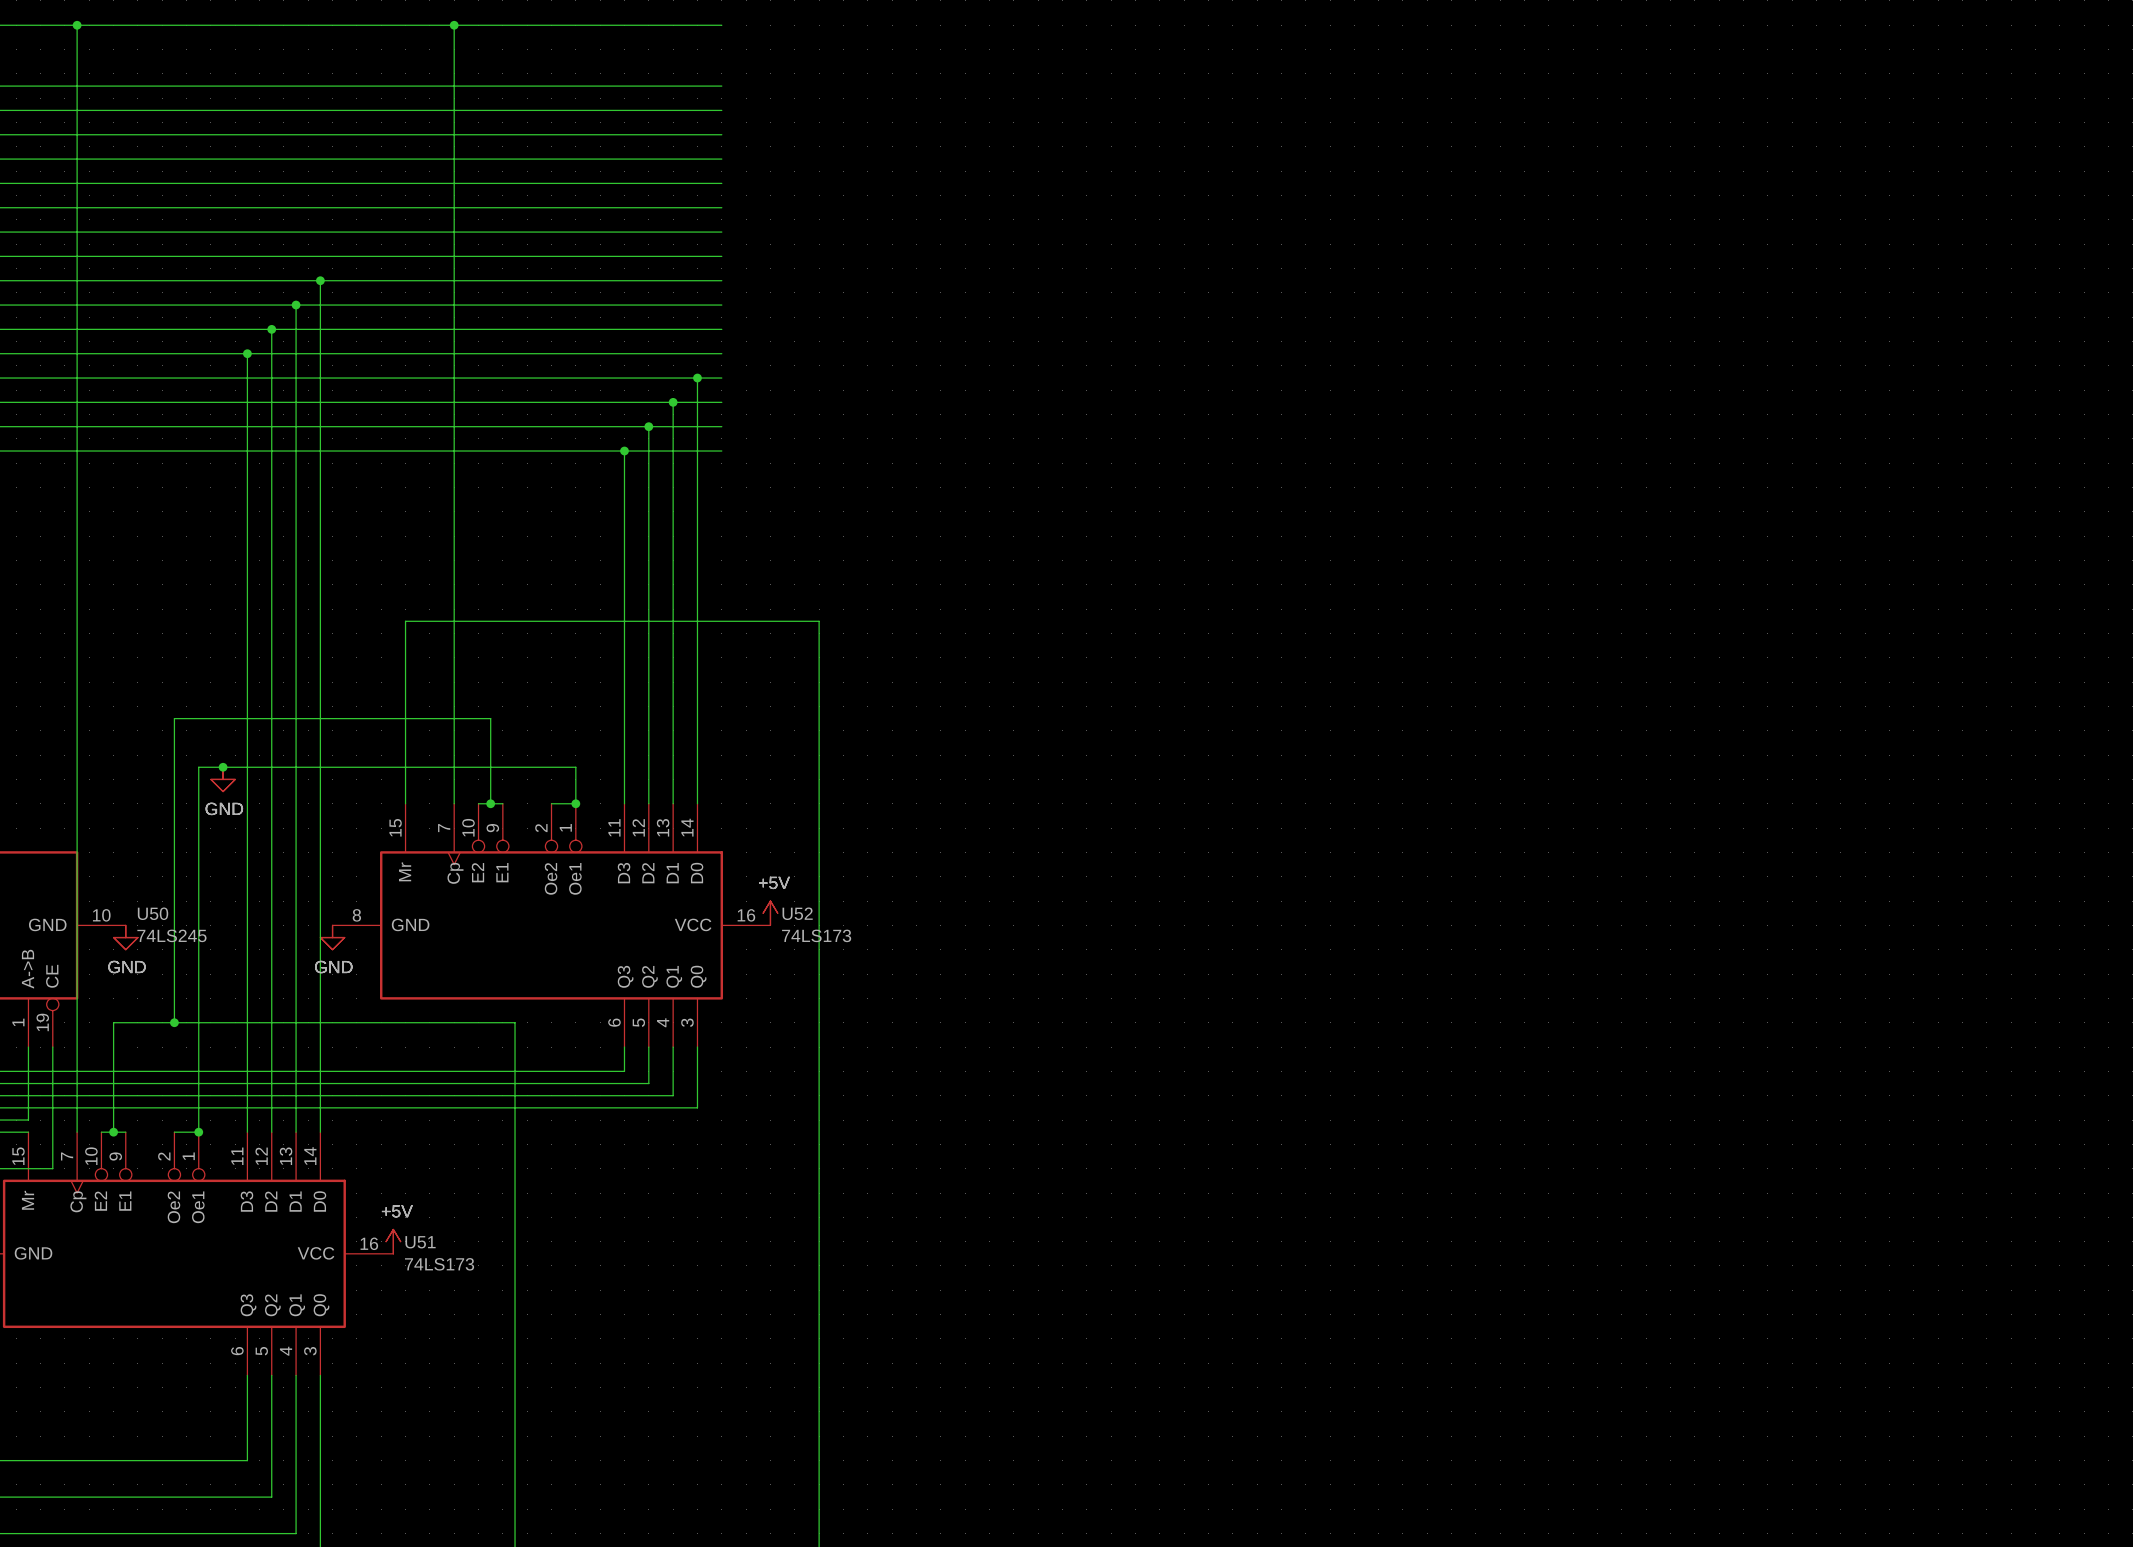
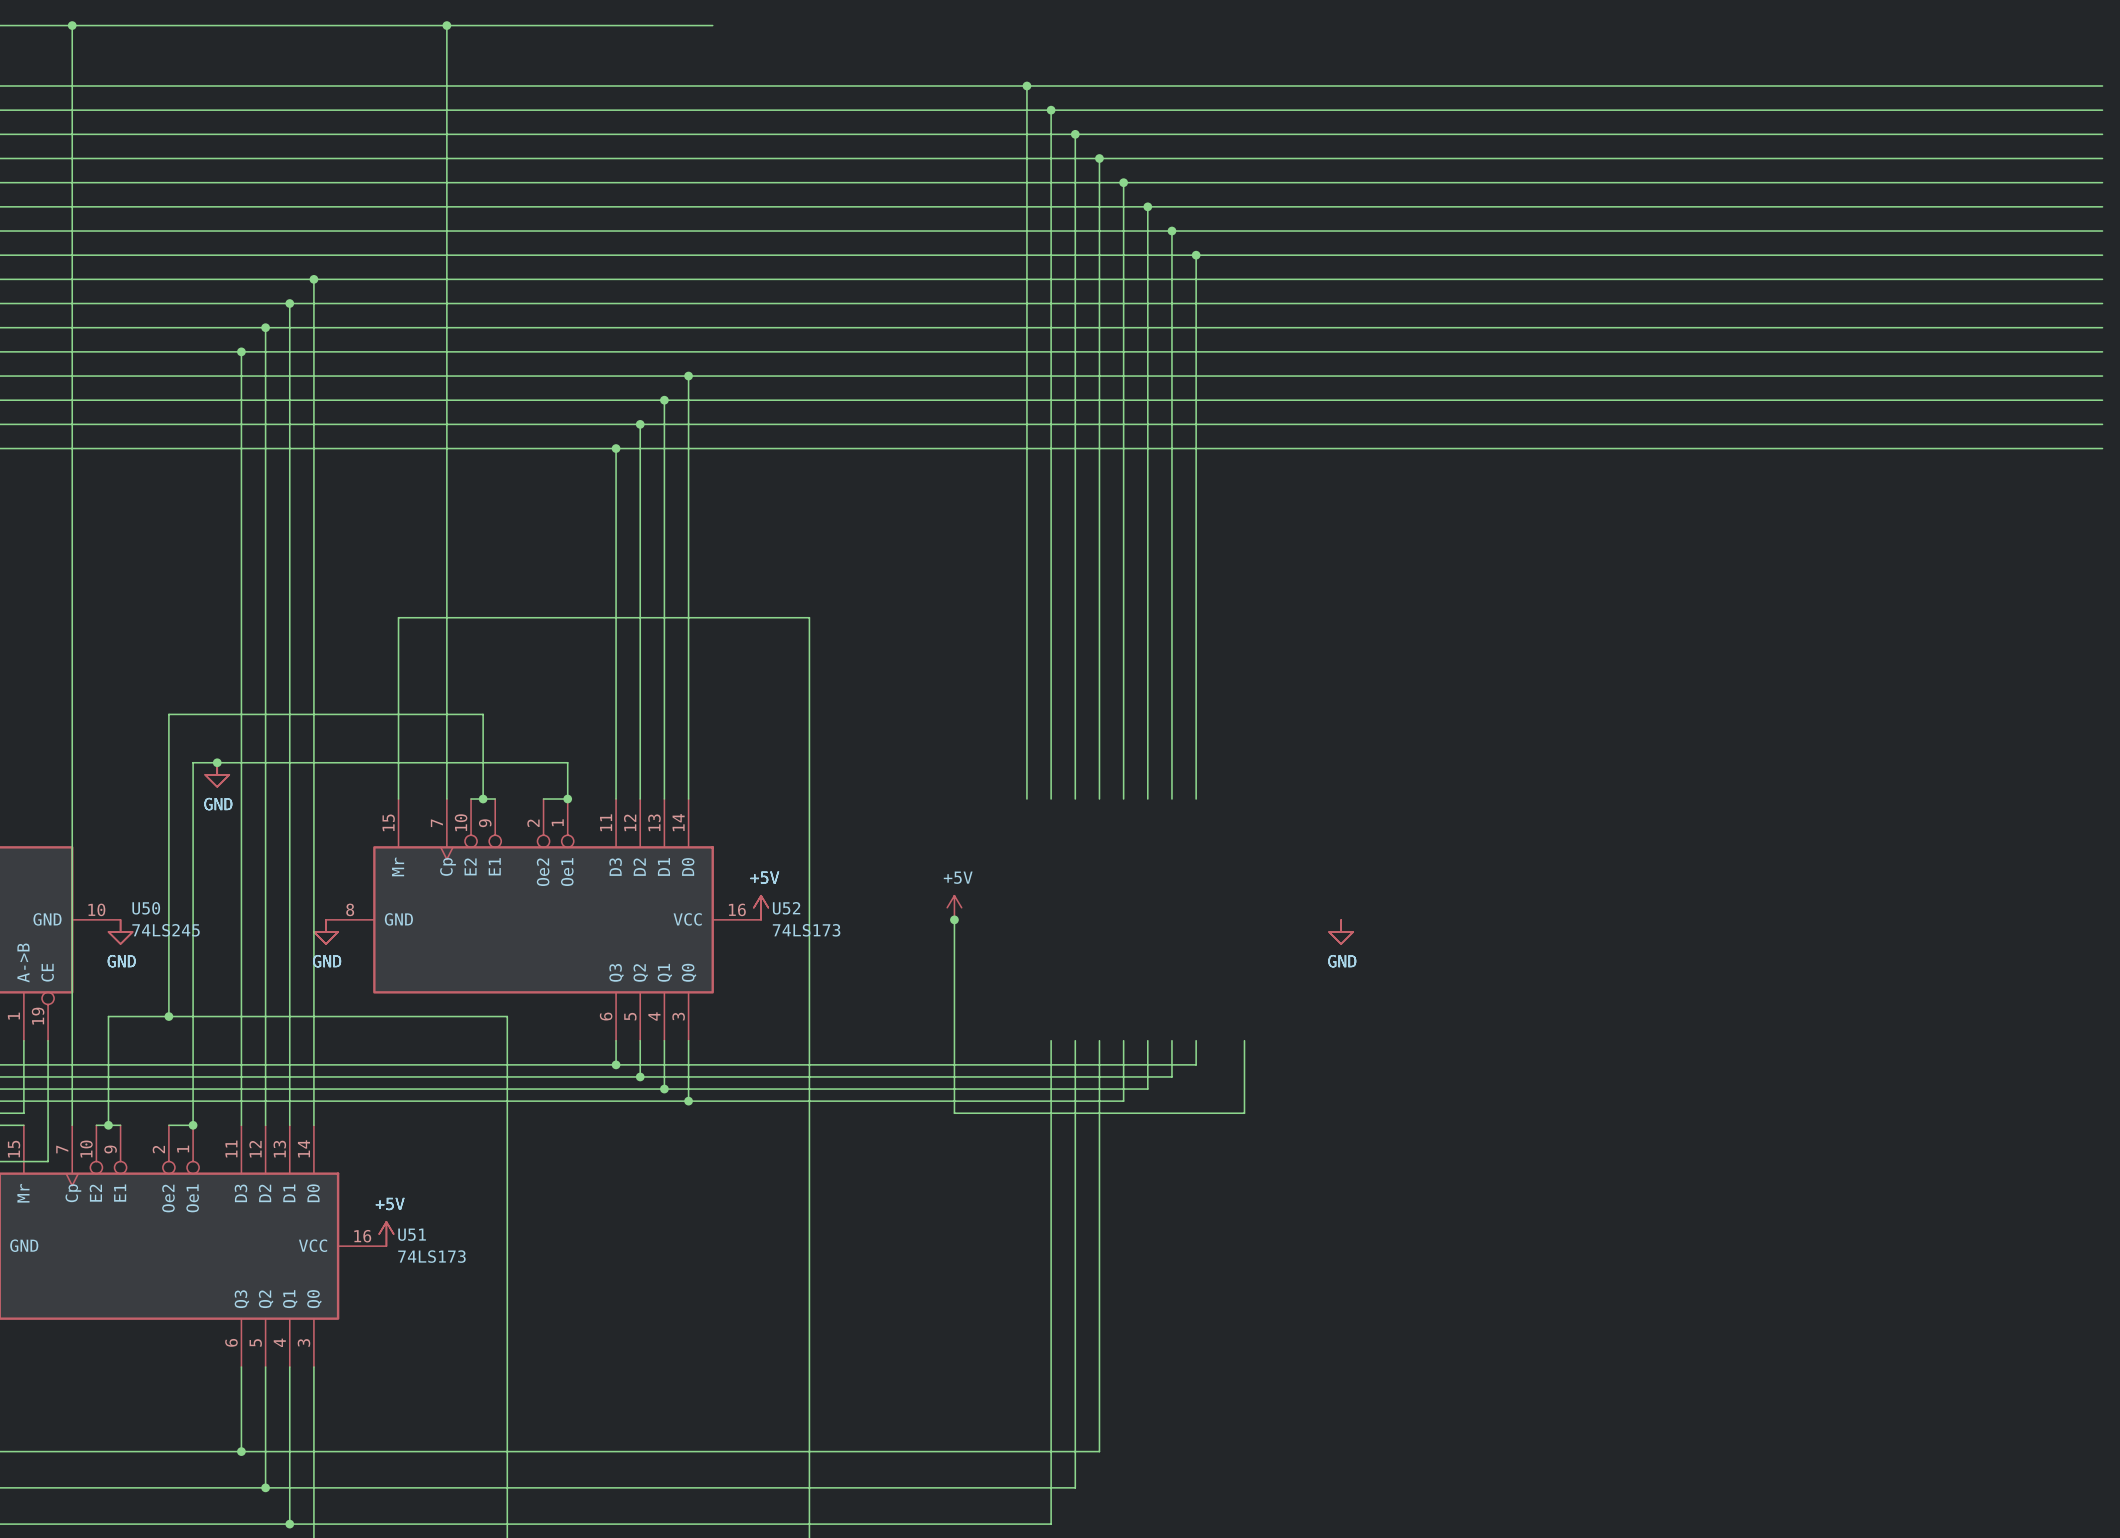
wire: none -> (712, 85) (2102, 85)
wire: none -> (1026, 85) (1026, 799)
junction: none -> (1026, 85)
wire: none -> (712, 110) (2102, 110)
wire: none -> (1051, 110) (1051, 799)
junction: none -> (1051, 110)
wire: none -> (712, 134) (2102, 134)
wire: none -> (1075, 134) (1075, 799)
junction: none -> (1075, 134)
wire: none -> (712, 158) (2102, 158)
wire: none -> (1099, 158) (1099, 799)
junction: none -> (1099, 158)
wire: none -> (712, 182) (2102, 182)
wire: none -> (1123, 182) (1123, 799)
junction: none -> (1123, 182)
wire: none -> (712, 206) (2102, 206)
wire: none -> (1147, 206) (1147, 799)
junction: none -> (1147, 206)
wire: none -> (712, 231) (2102, 231)
wire: none -> (1171, 231) (1171, 799)
junction: none -> (1171, 231)
wire: none -> (712, 255) (2102, 255)
wire: none -> (1196, 255) (1196, 799)
junction: none -> (1196, 255)
wire: none -> (712, 279) (2102, 279)
wire: none -> (712, 303) (2102, 303)
wire: none -> (712, 327) (2102, 327)
wire: none -> (712, 351) (2102, 351)
wire: none -> (712, 376) (2102, 376)
wire: none -> (712, 400) (2102, 400)
wire: none -> (712, 424) (2102, 424)
wire: none -> (712, 448) (2102, 448)
power symbol: none -> +5V (954, 907)
wire: none -> (954, 919) (954, 1113) (1244, 1113) (1244, 1040)
junction: none -> (954, 919)
power symbol: none -> GND (1341, 931)
wire: none -> (1051, 1040) (1051, 1524) (289, 1524)
wire: none -> (1075, 1040) (1075, 1487) (265, 1487)
wire: none -> (1099, 1040) (1099, 1451) (241, 1451)
wire: none -> (1123, 1040) (1123, 1101) (688, 1101)
wire: none -> (1147, 1040) (1147, 1089) (664, 1089)
wire: none -> (1171, 1040) (1171, 1076) (640, 1076)
wire: none -> (1196, 1040) (1196, 1064) (616, 1064)
junction: none -> (616, 1064)
junction: none -> (640, 1076)
junction: none -> (664, 1089)
junction: none -> (688, 1101)
junction: none -> (241, 1451)
junction: none -> (265, 1487)
junction: none -> (289, 1524)

